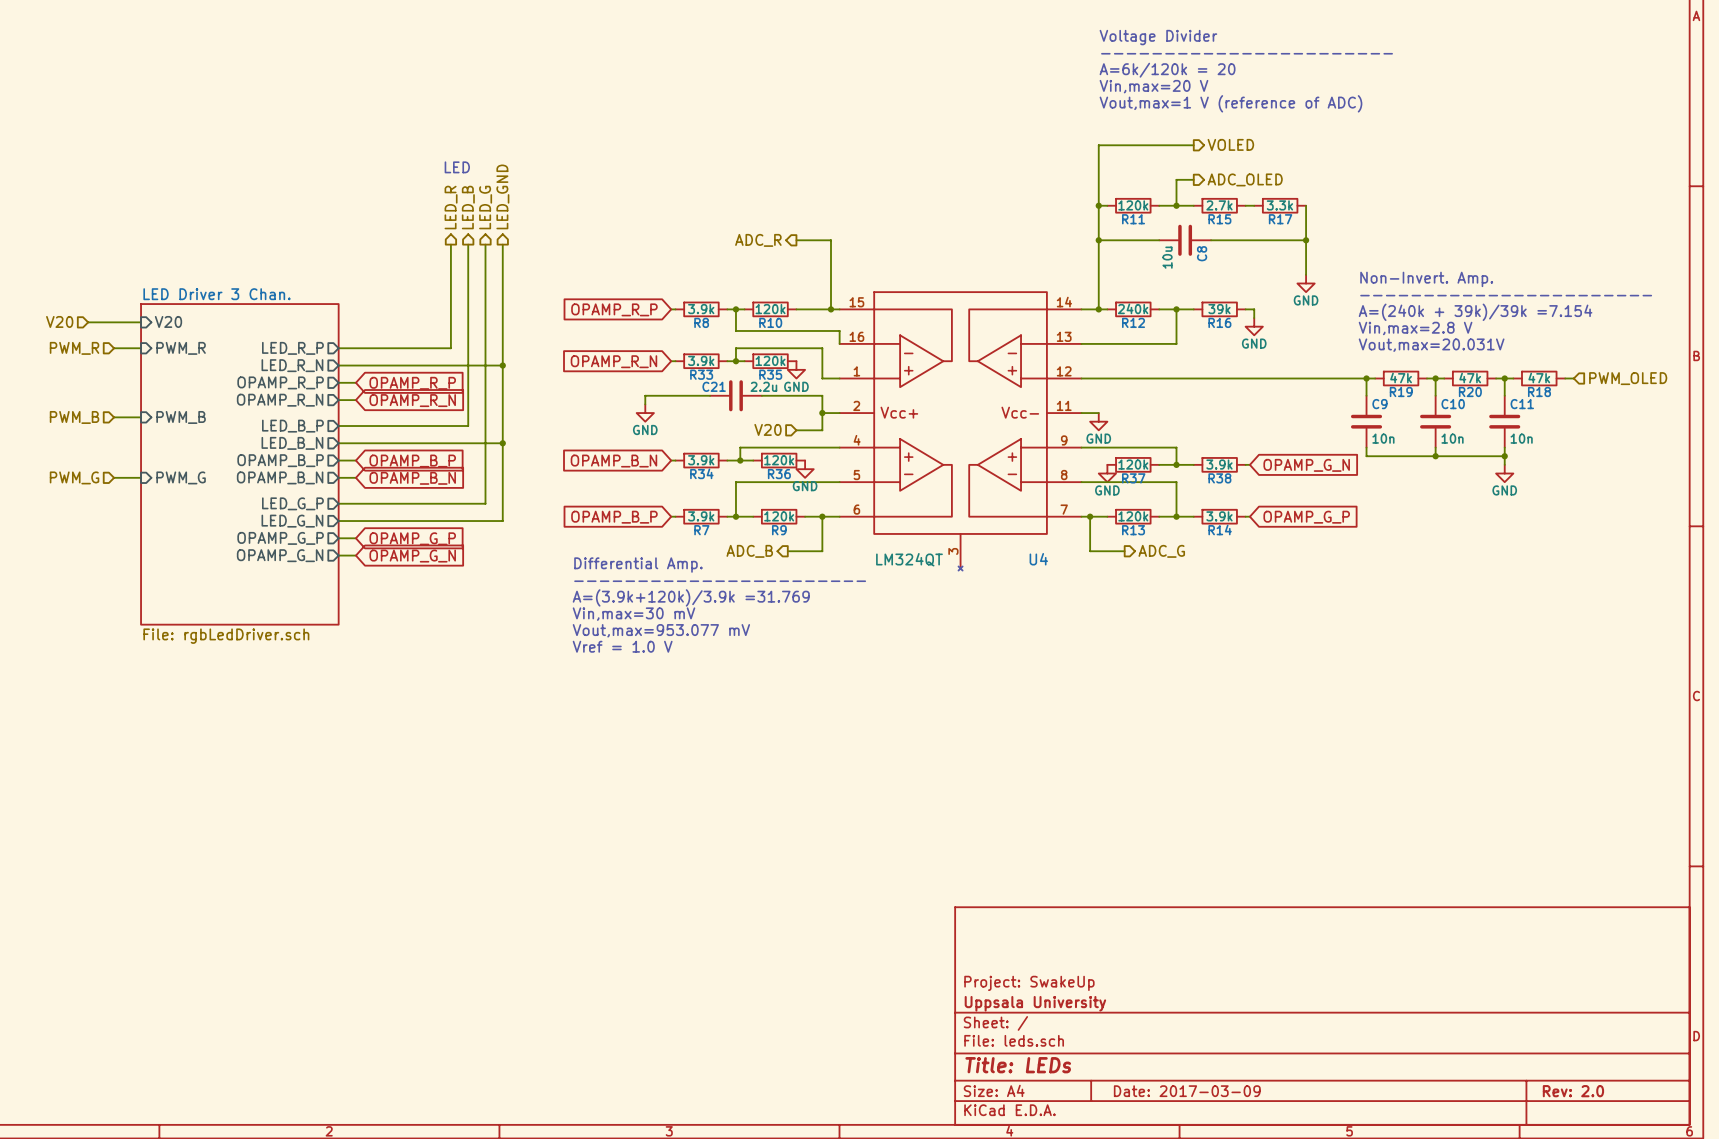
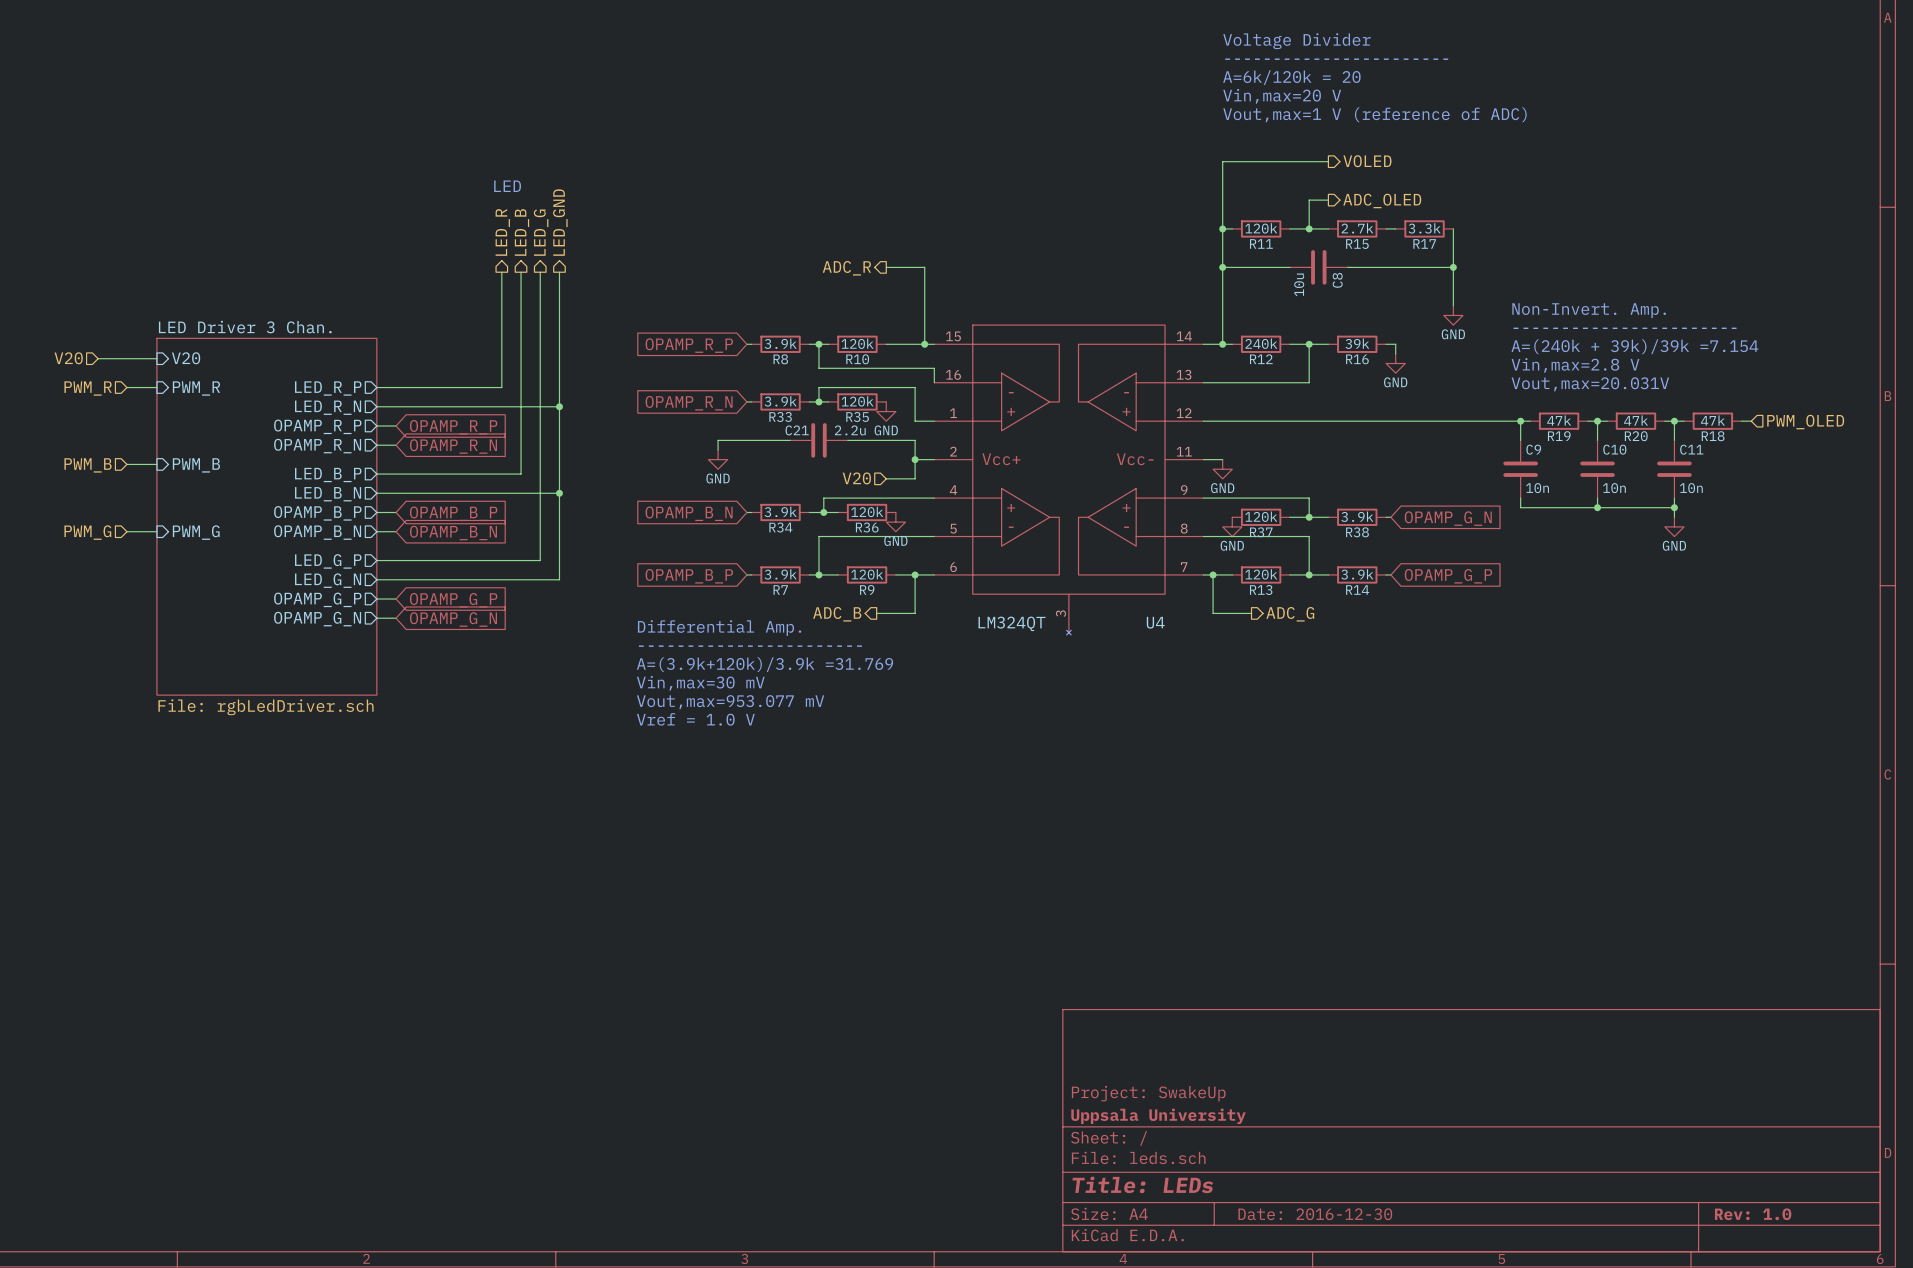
title block: Date: 2017-03-09 (1187, 1091) -> Date: 2016-12-30 (1315, 1214)
title block: Rev: 2.0 (1573, 1091) -> Rev: 1.0 (1753, 1214)

